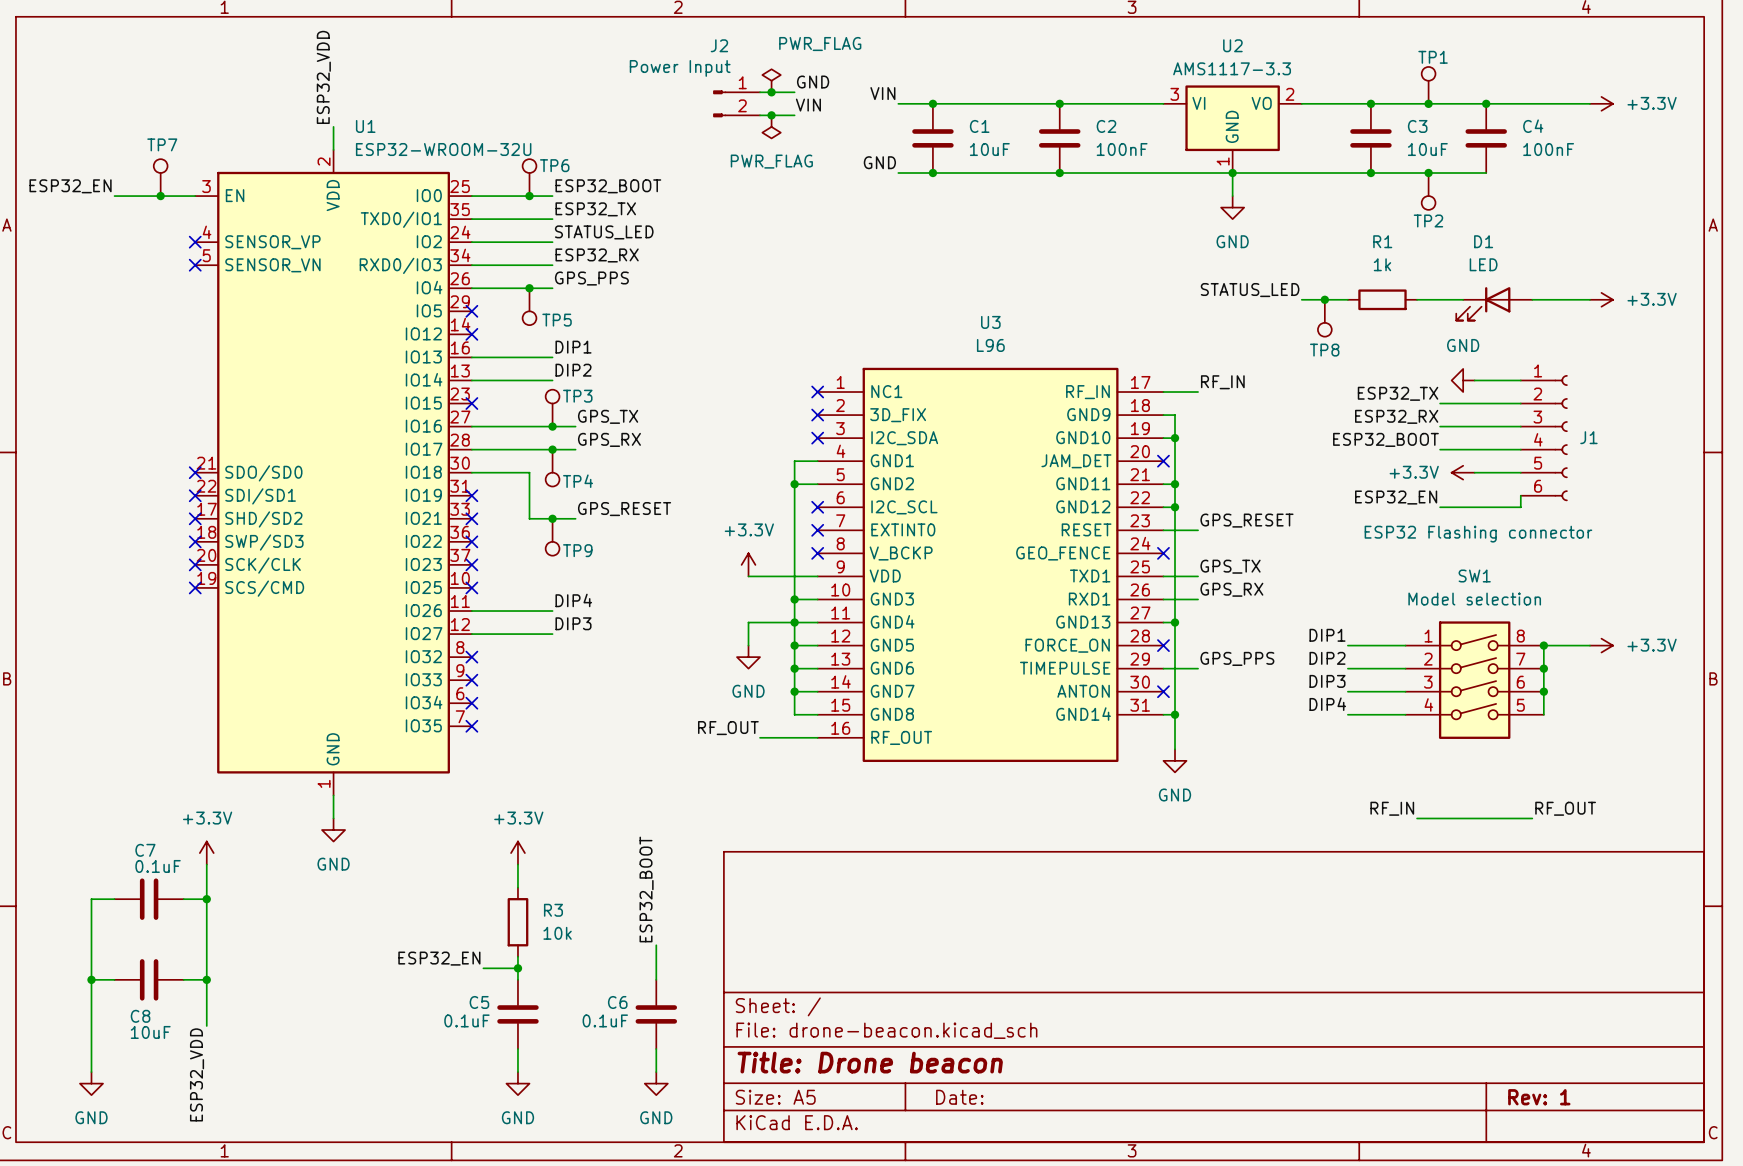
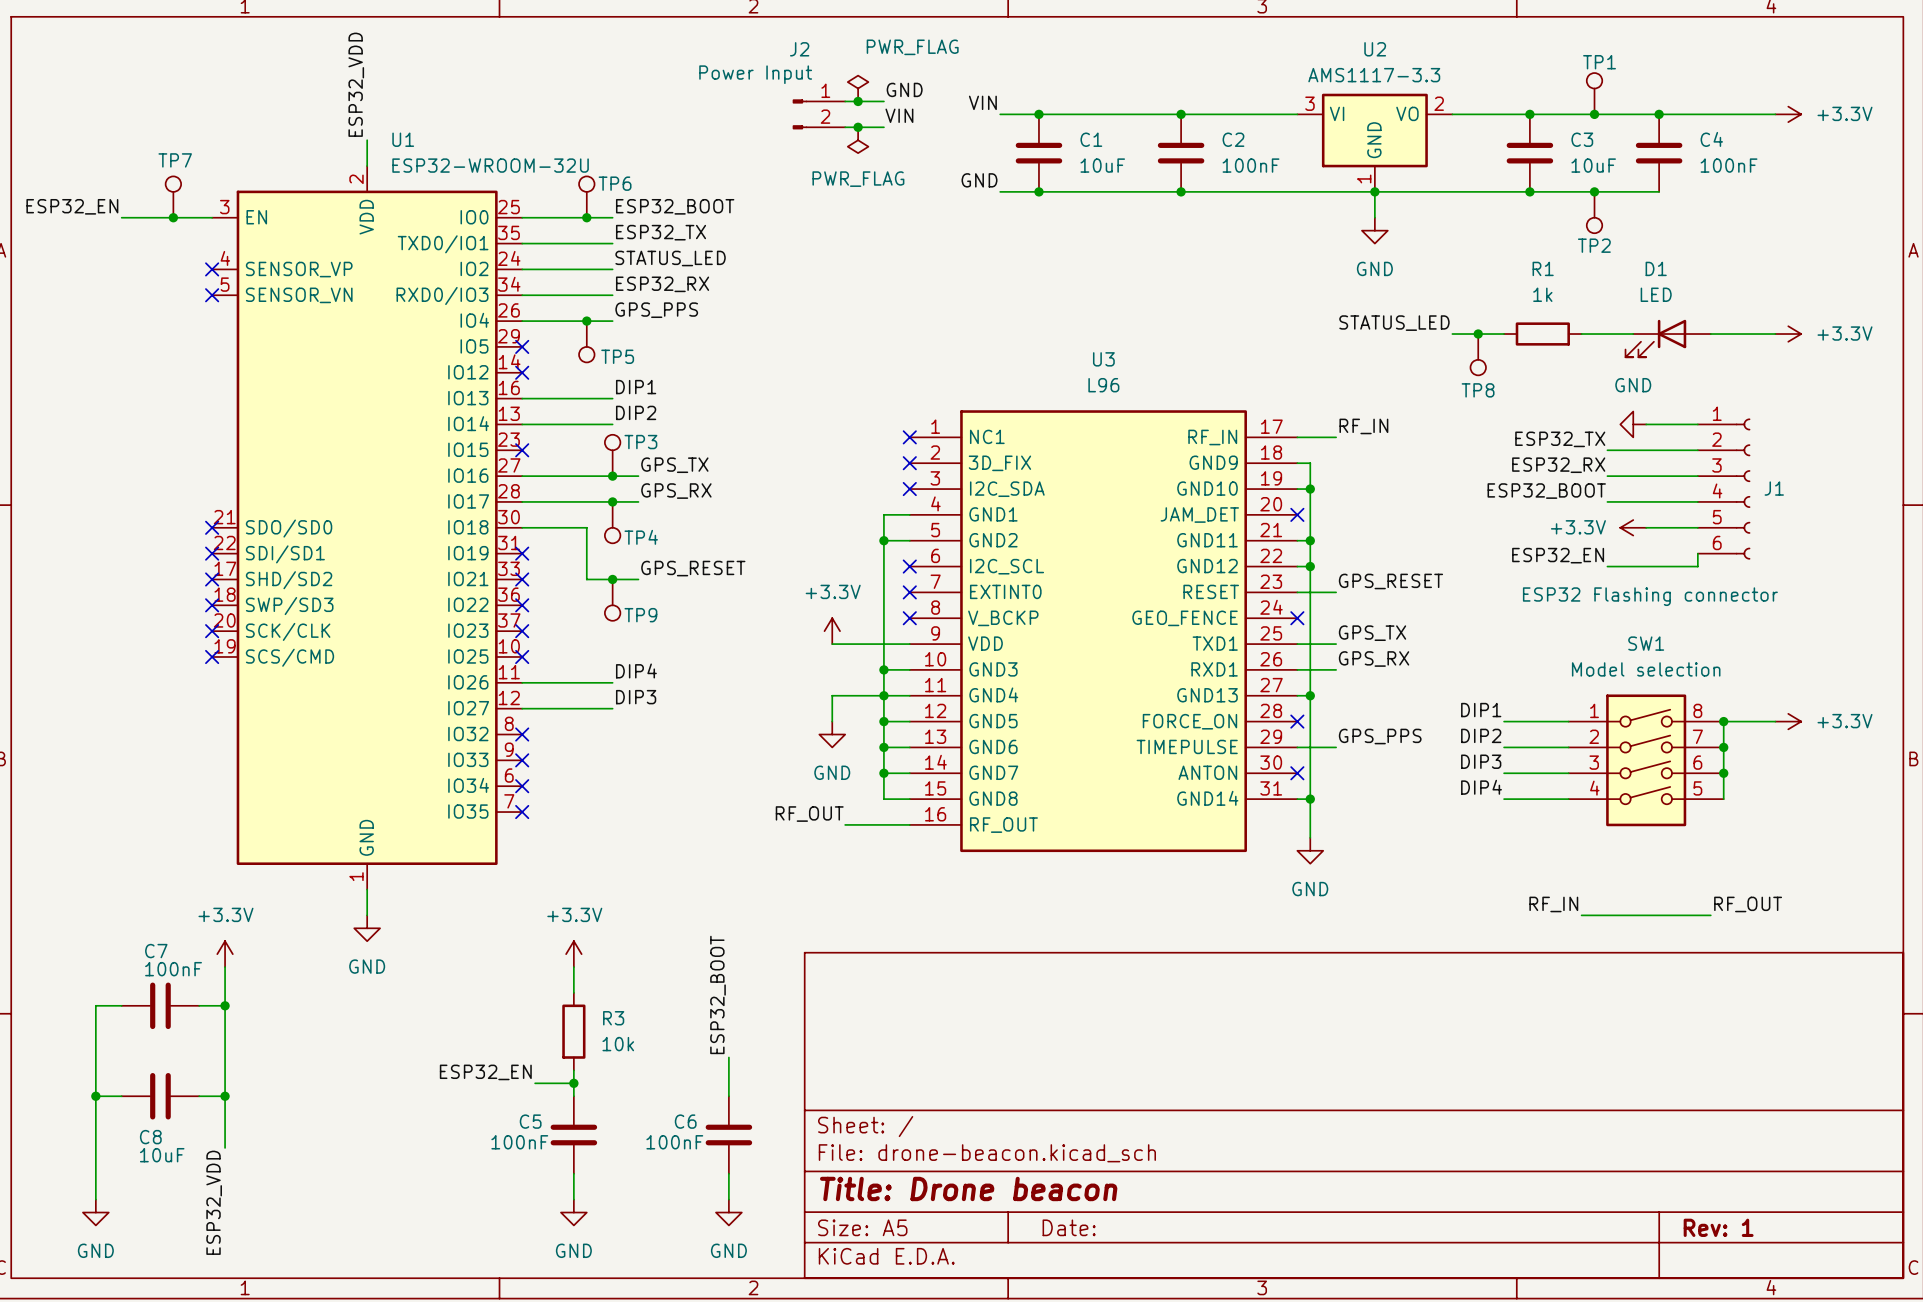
C7 value: 0.1uF (158, 866) -> 100nF (173, 969)
C5 value: 0.1uF (466, 1020) -> 100nF (519, 1142)
C6 value: 0.1uF (605, 1020) -> 100nF (674, 1142)

